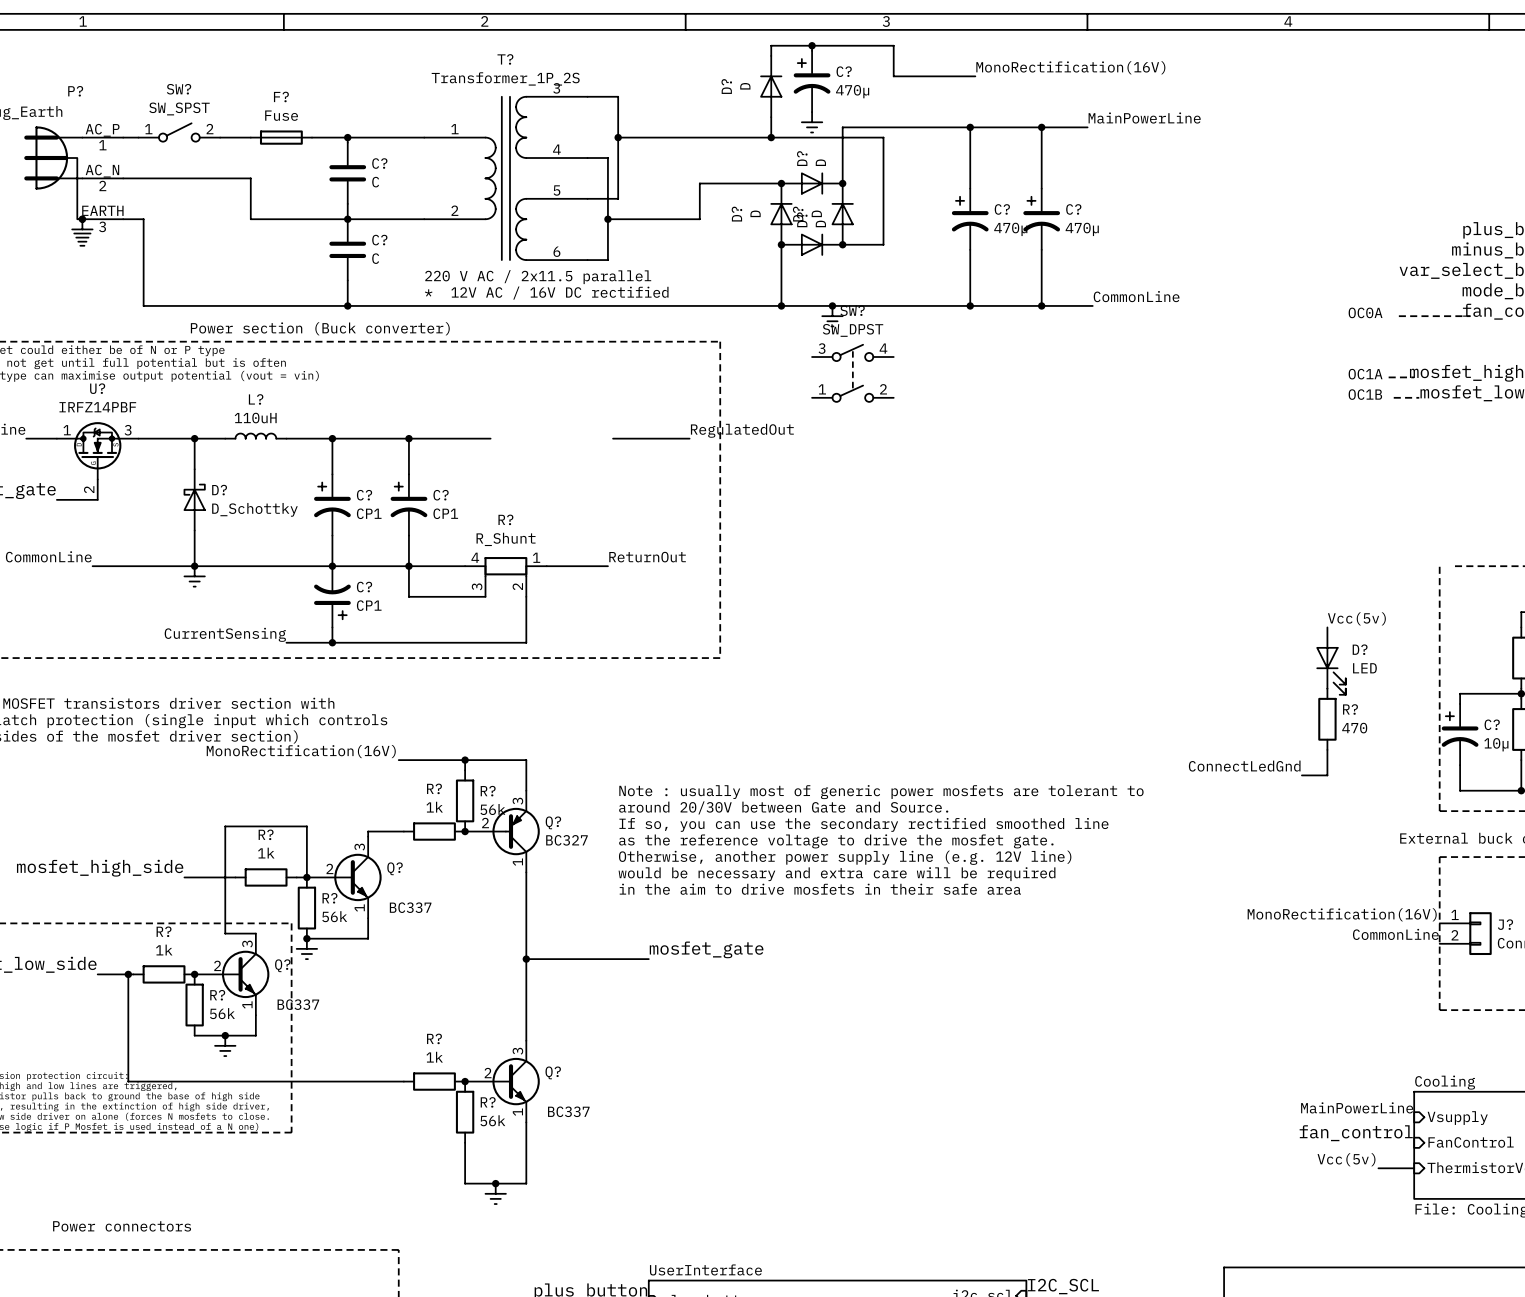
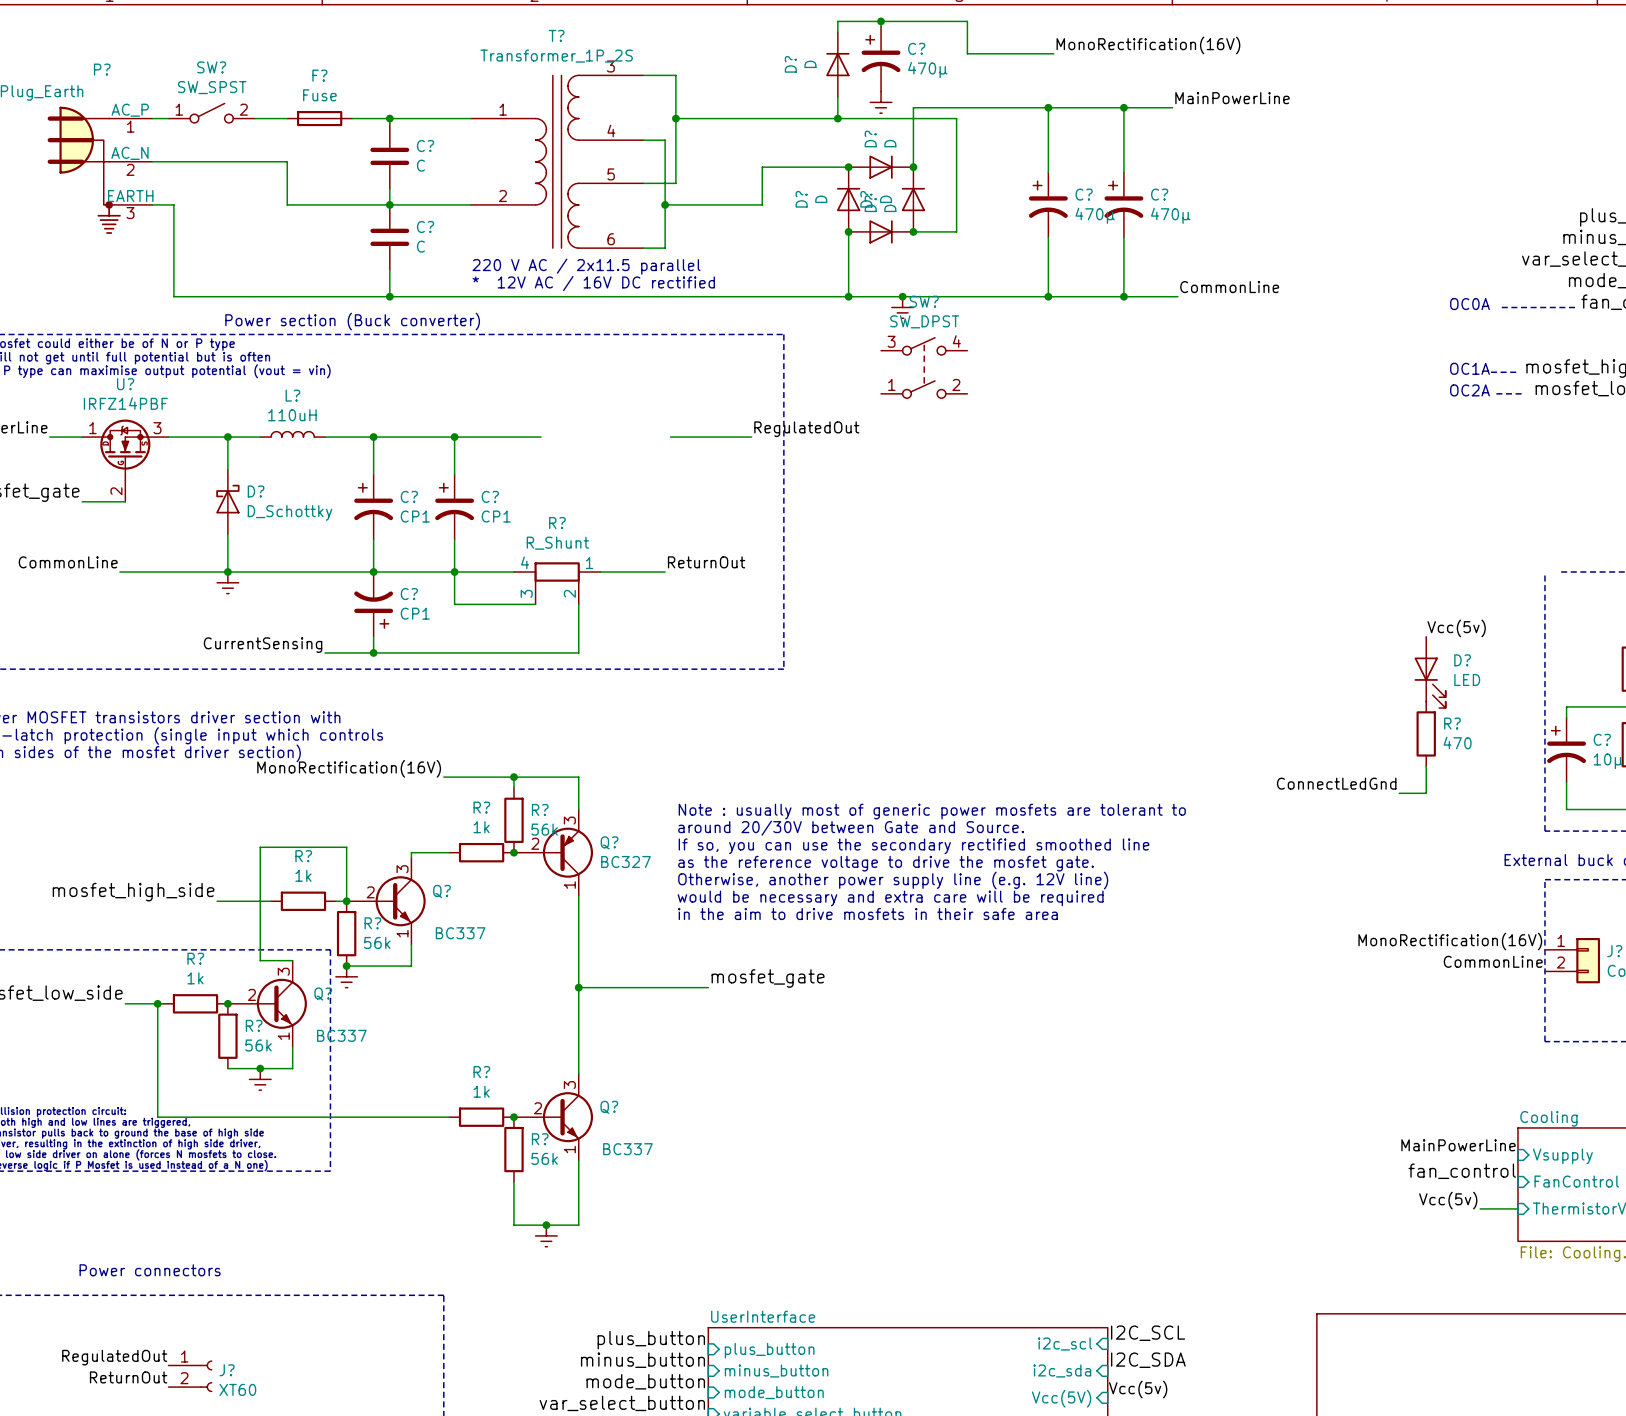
text: OC1B (1365, 394) -> OC2A (1470, 390)

